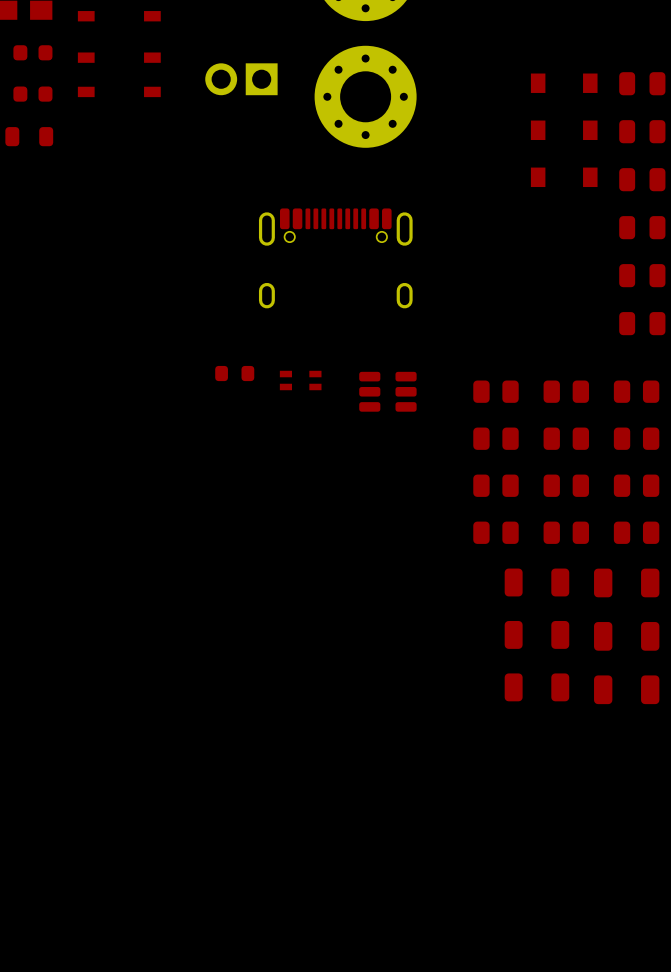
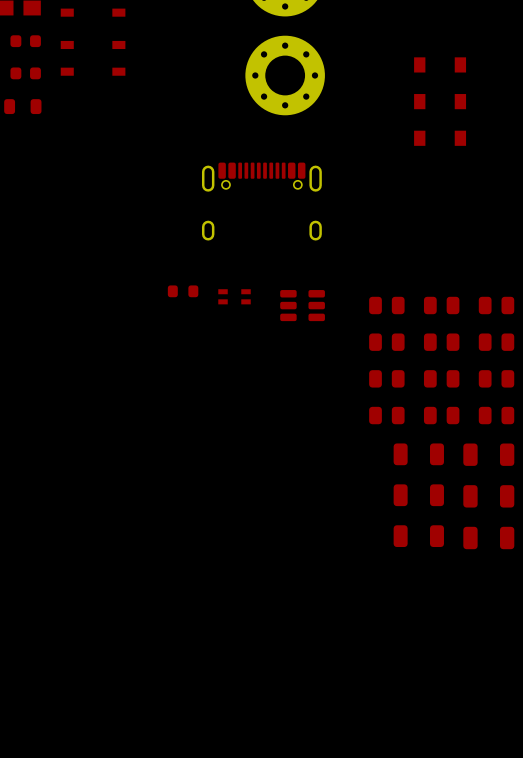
part: (241, 79) -> none
part: (642, 83) -> none
part: (642, 131) -> none
part: (642, 179) -> none
part: (642, 227) -> none
part: (642, 275) -> none
part: (642, 323) -> none

